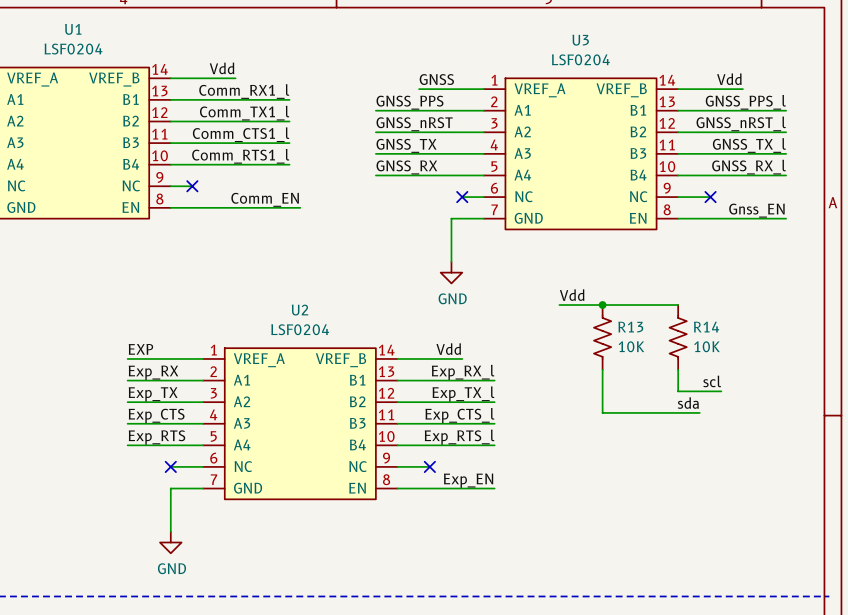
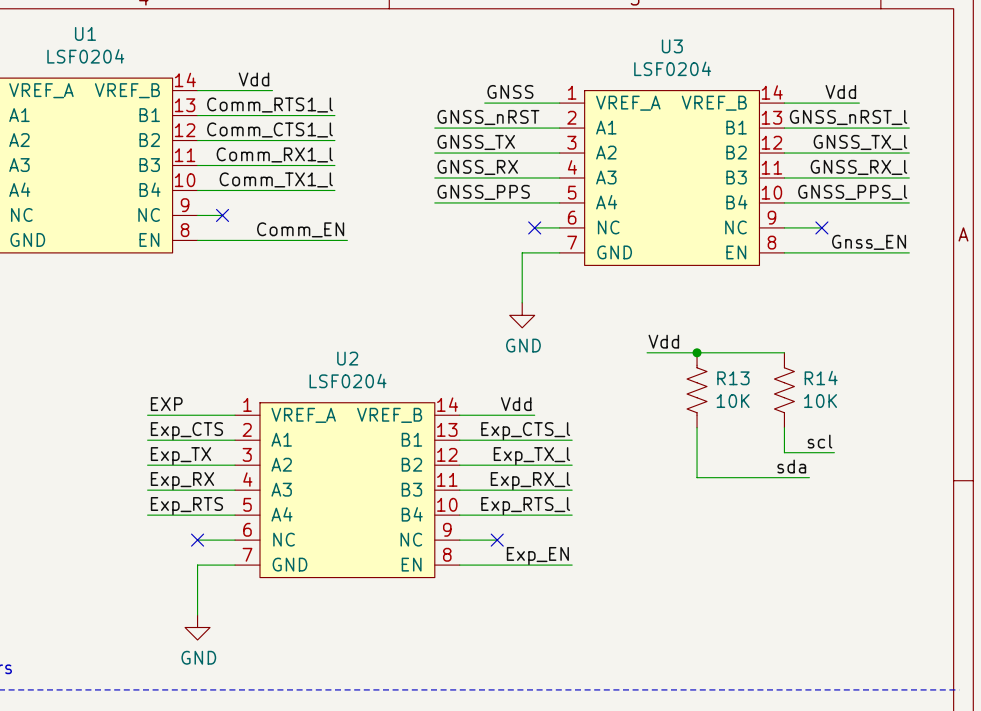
label: Comm_RX1_l (244, 91) -> Comm_RTS1_l (270, 105)
label: GNSS_PPS (409, 102) -> GNSS_nRST (488, 117)
label: GNSS_PPS_l (745, 102) -> GNSS_nRST_l (848, 117)
label: Comm_TX1_l (244, 113) -> Comm_CTS1_l (270, 129)
label: GNSS_nRST_l (741, 123) -> GNSS_TX_l (860, 142)
label: GNSS_nRST (414, 124) -> GNSS_TX (476, 142)
label: Comm_CTS1_l (241, 134) -> Comm_RX1_l (274, 154)
label: GNSS_TX (406, 145) -> GNSS_RX (477, 167)
label: GNSS_TX_l (749, 145) -> GNSS_RX_l (858, 167)
label: Comm_RTS1_l (240, 156) -> Comm_TX1_l (276, 179)
label: GNSS_RX (406, 167) -> GNSS_PPS (483, 192)
label: GNSS_RX_l (749, 167) -> GNSS_PPS_l (852, 192)
label: Exp_RX (153, 372) -> Exp_CTS (186, 431)
label: Exp_RX_l (463, 372) -> Exp_CTS_l (525, 431)
label: Exp_CTS (156, 415) -> Exp_RX (182, 481)
label: Exp_CTS_l (459, 415) -> Exp_RX_l (530, 481)

